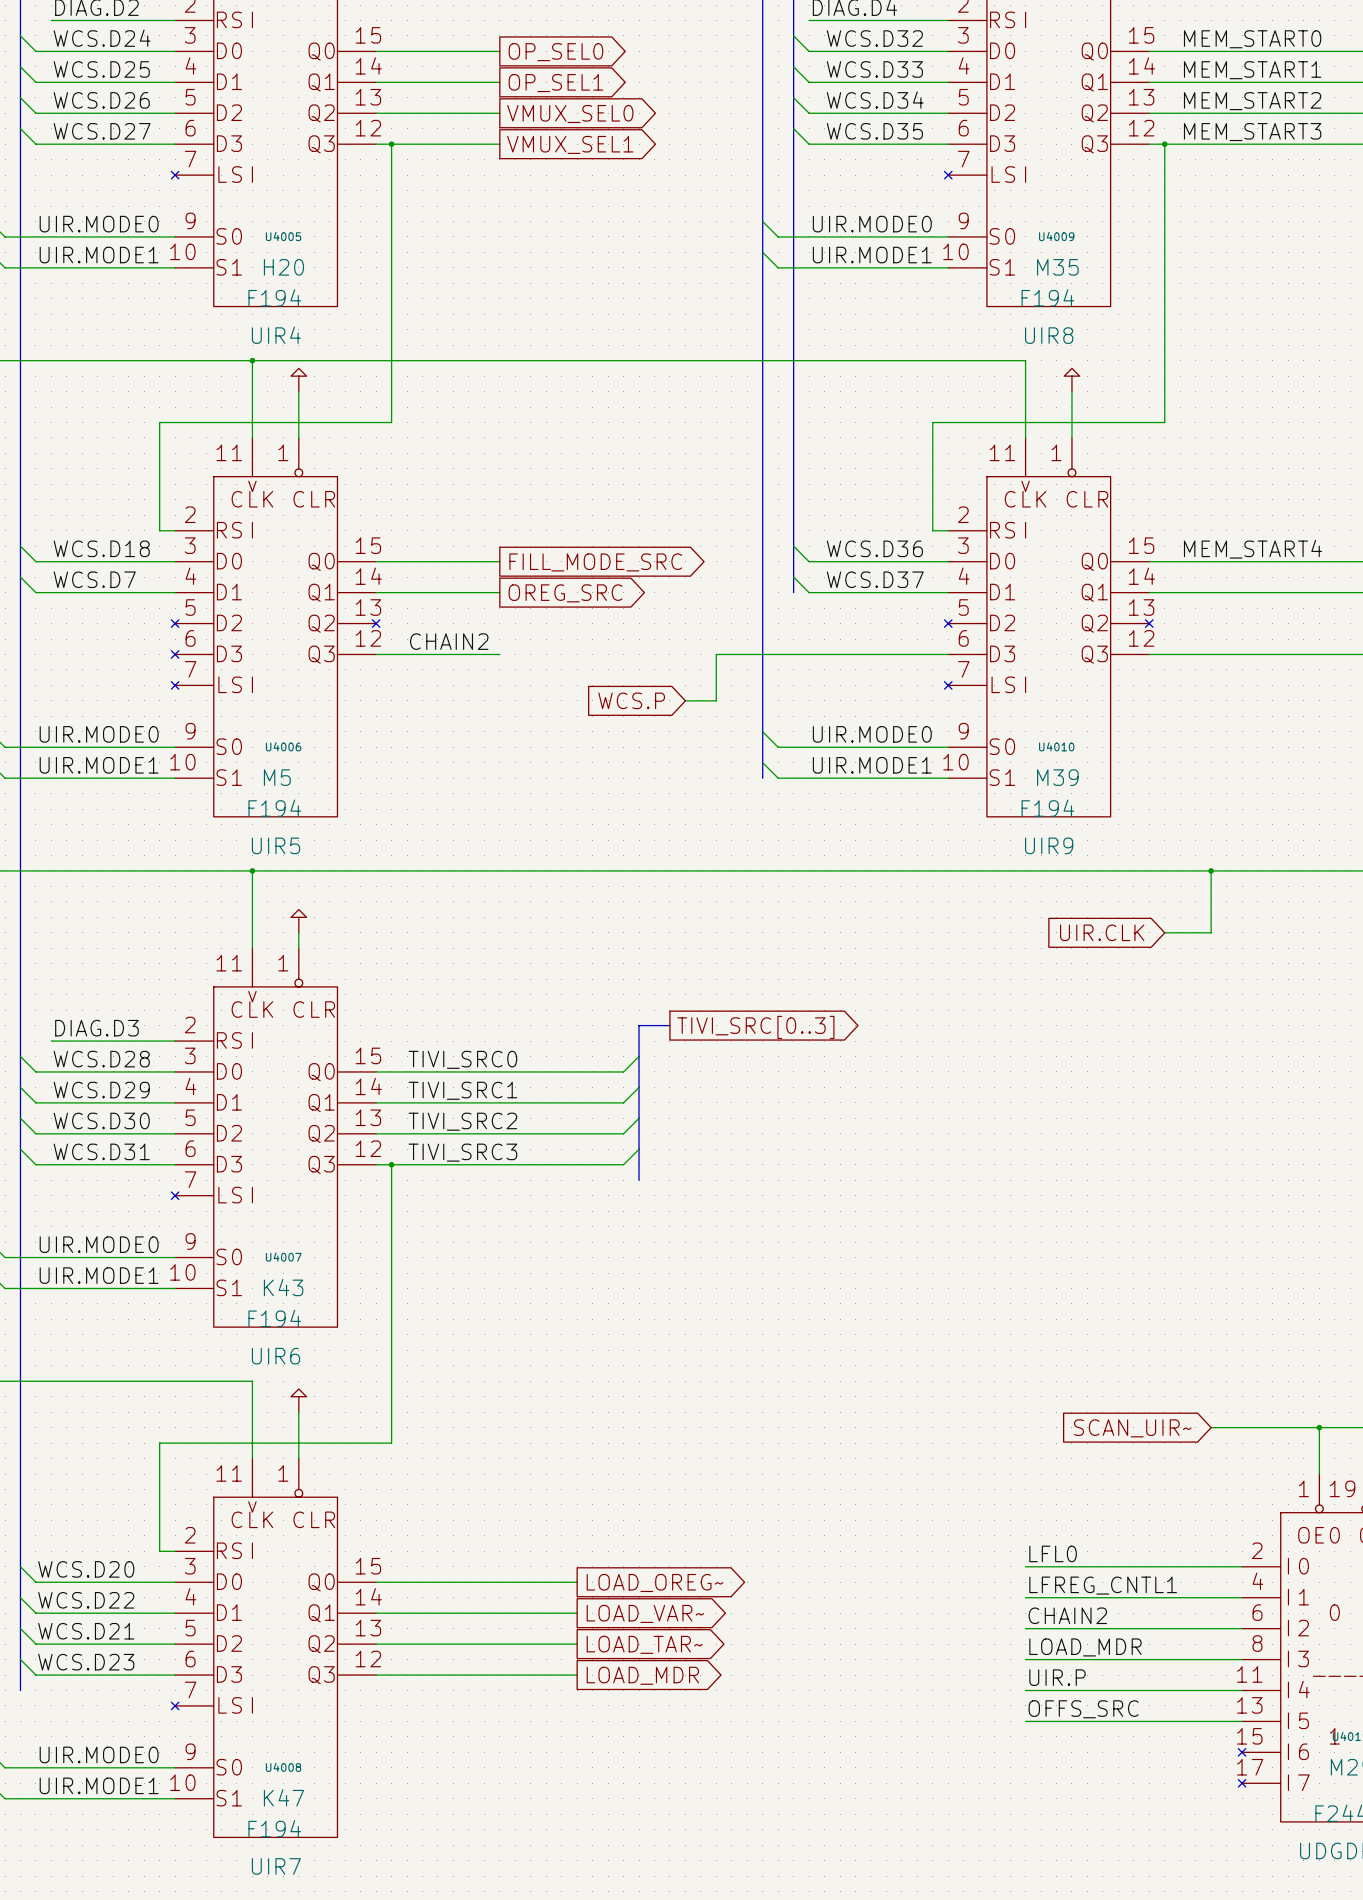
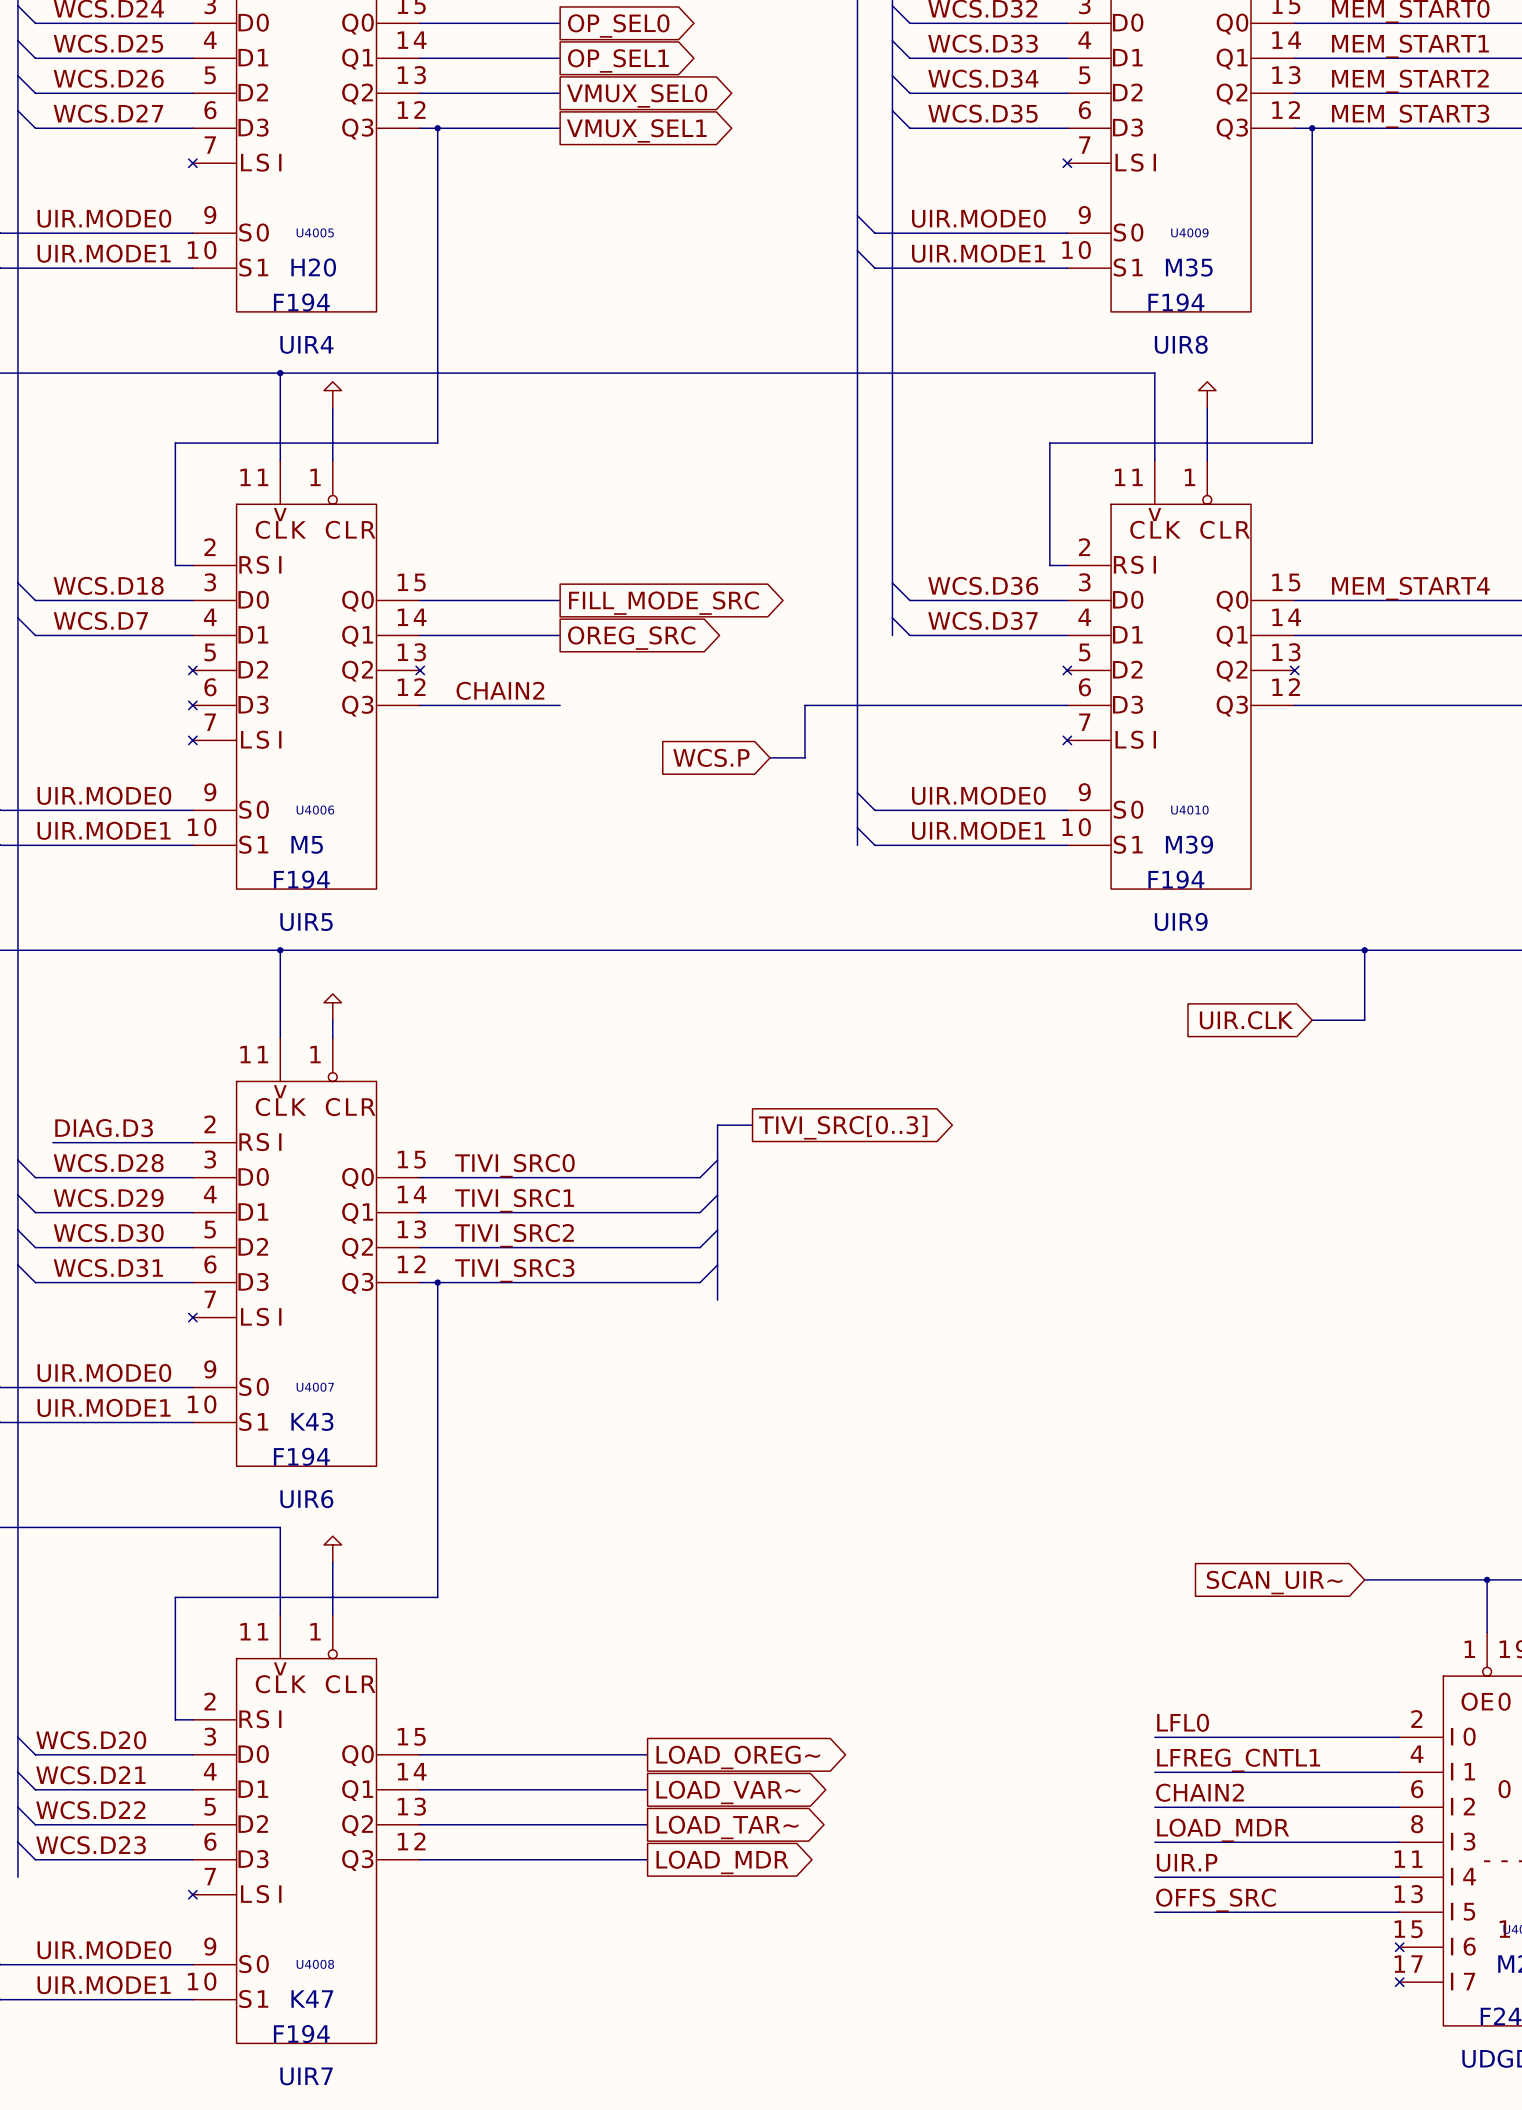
label: WCS.D22 (86, 1600) -> WCS.D21 (90, 1775)
label: WCS.D21 (86, 1631) -> WCS.D22 (90, 1810)

